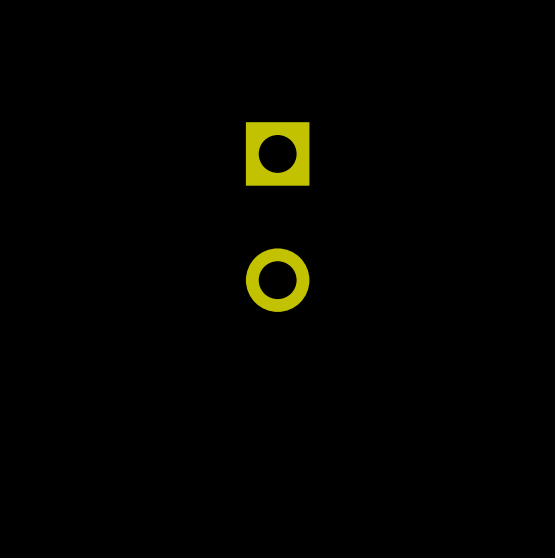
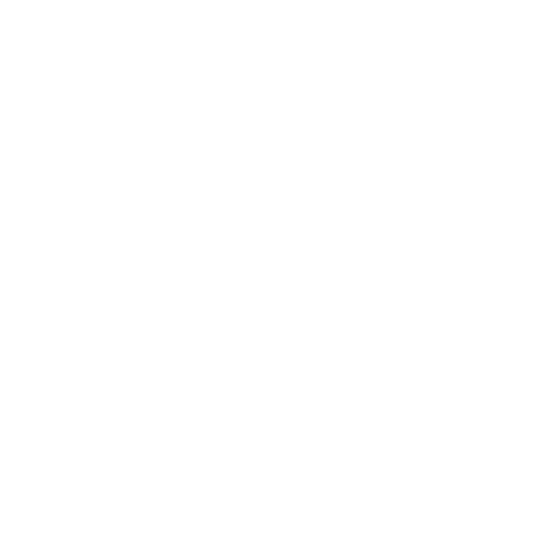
part: (277, 217) -> none

